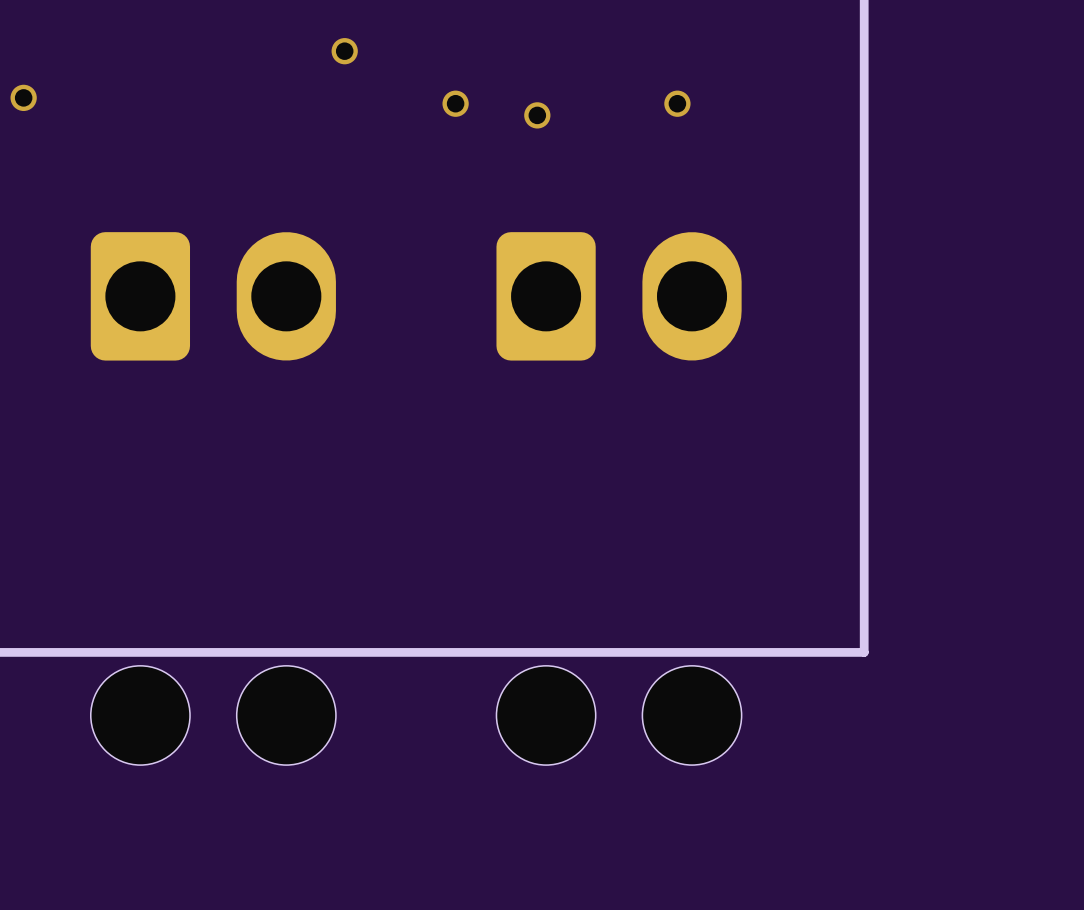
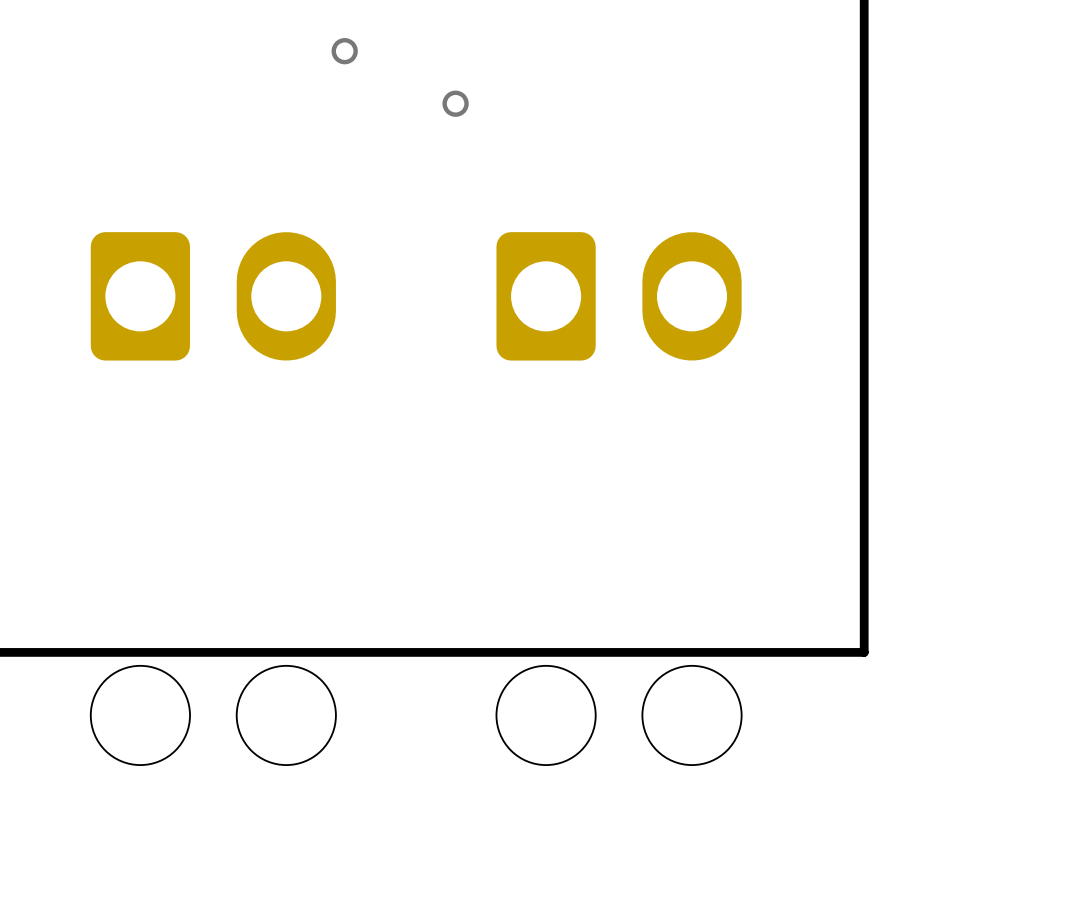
via: (23, 97) -> none
via: (677, 103) -> none
via: (537, 115) -> none

